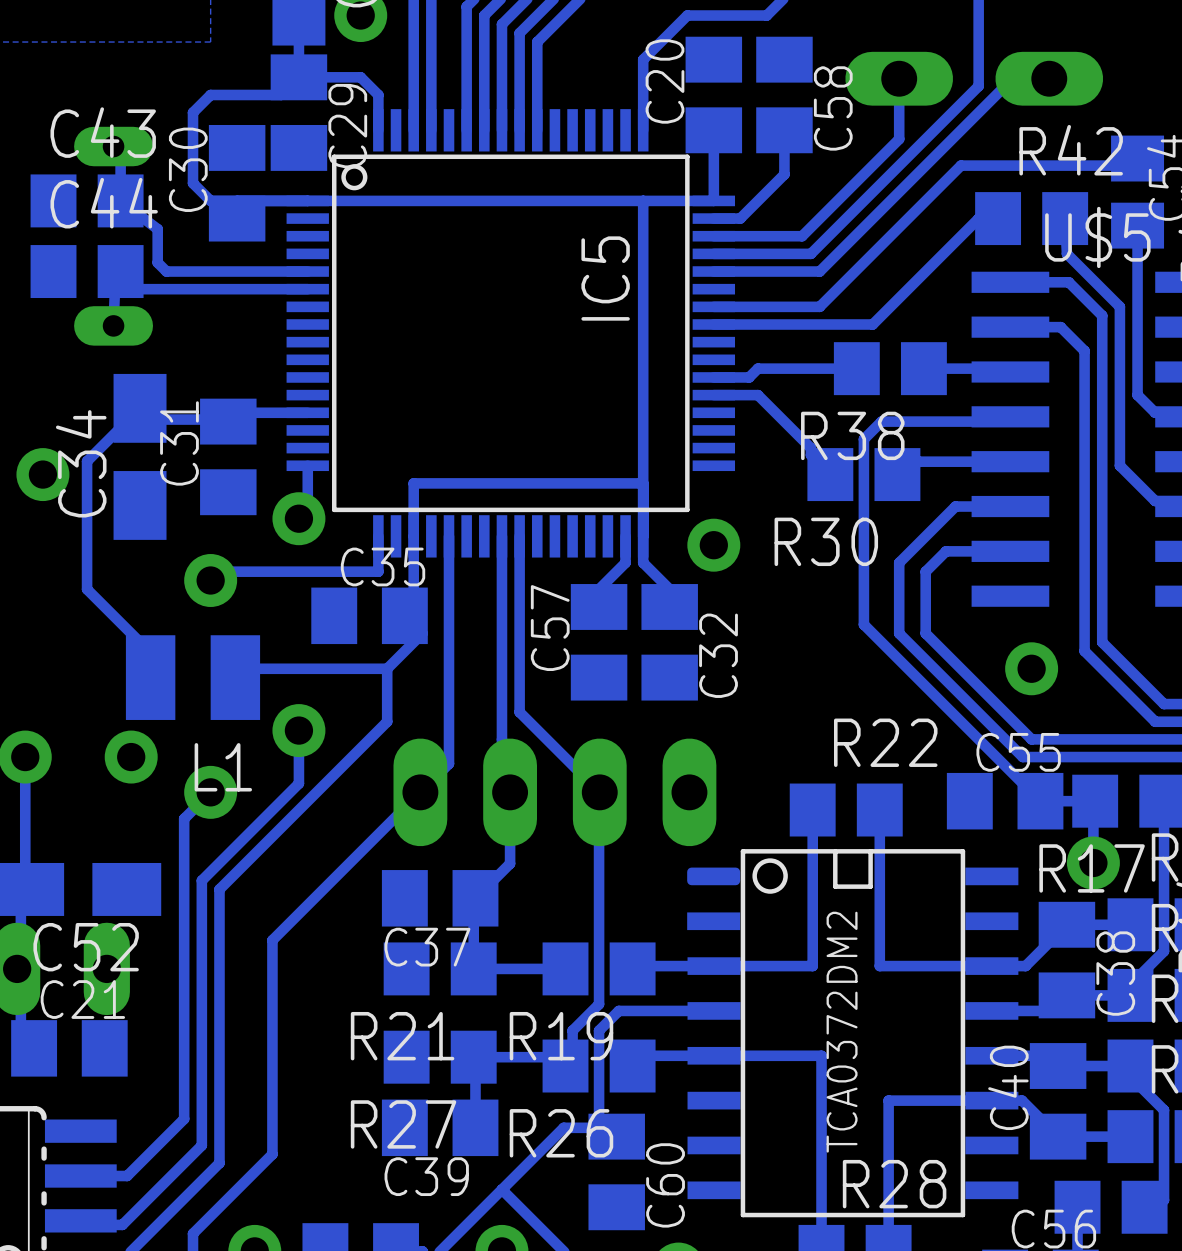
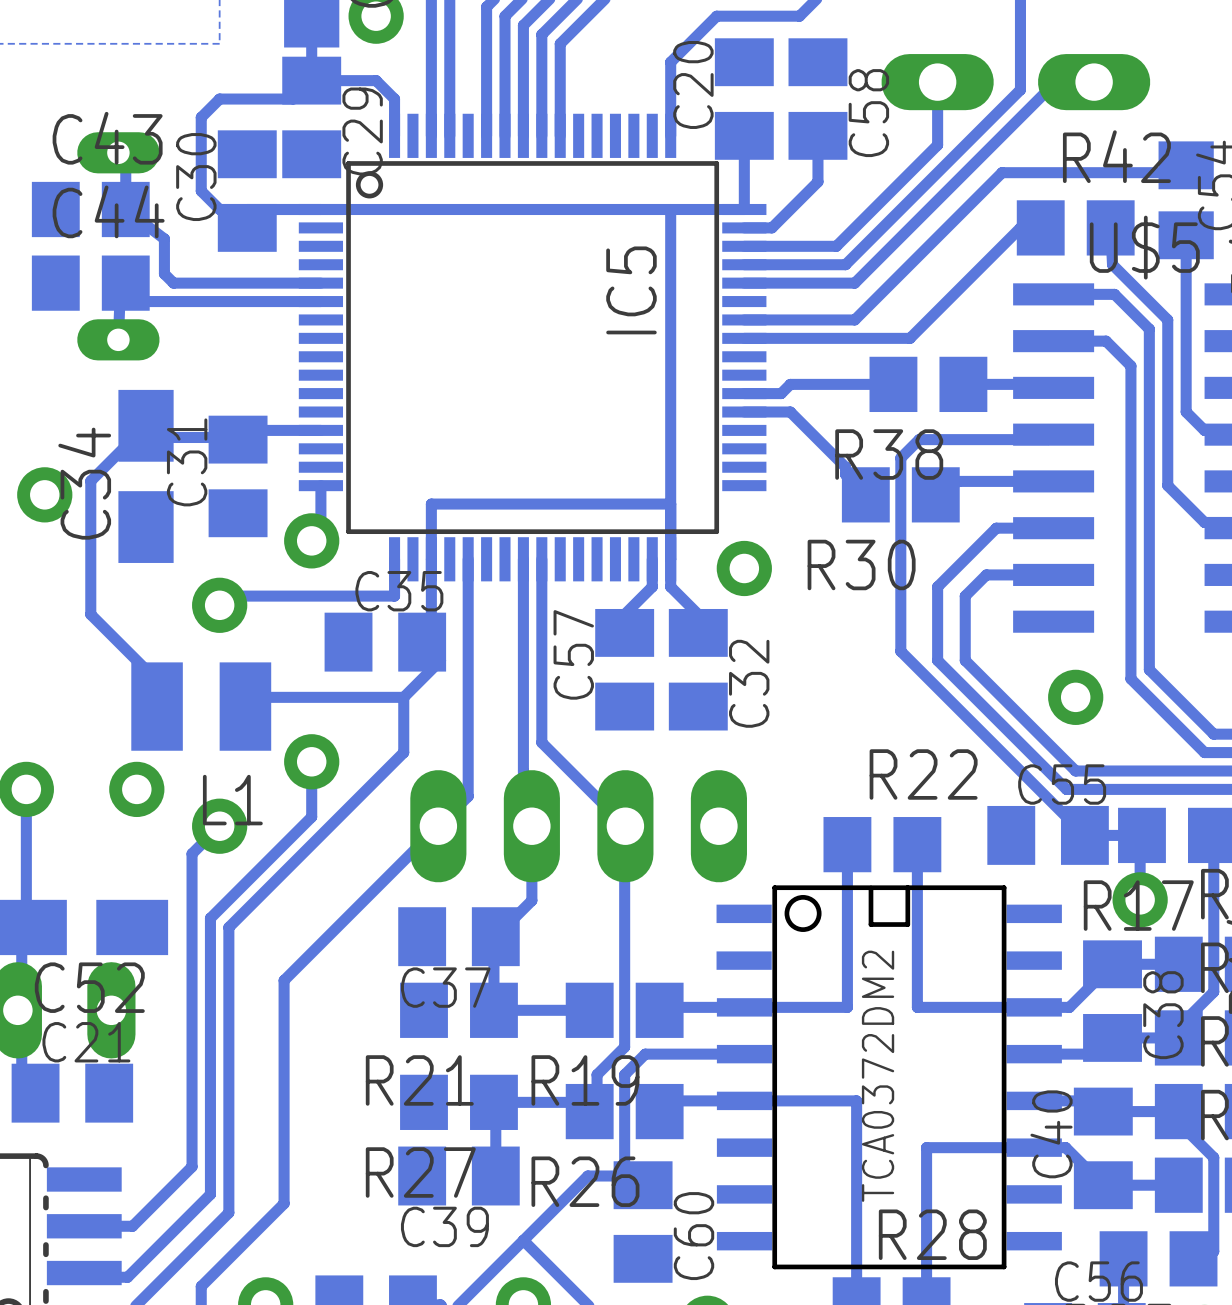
part footprint: [687, 849, 1019, 1218] -> [716, 885, 1062, 1270]

